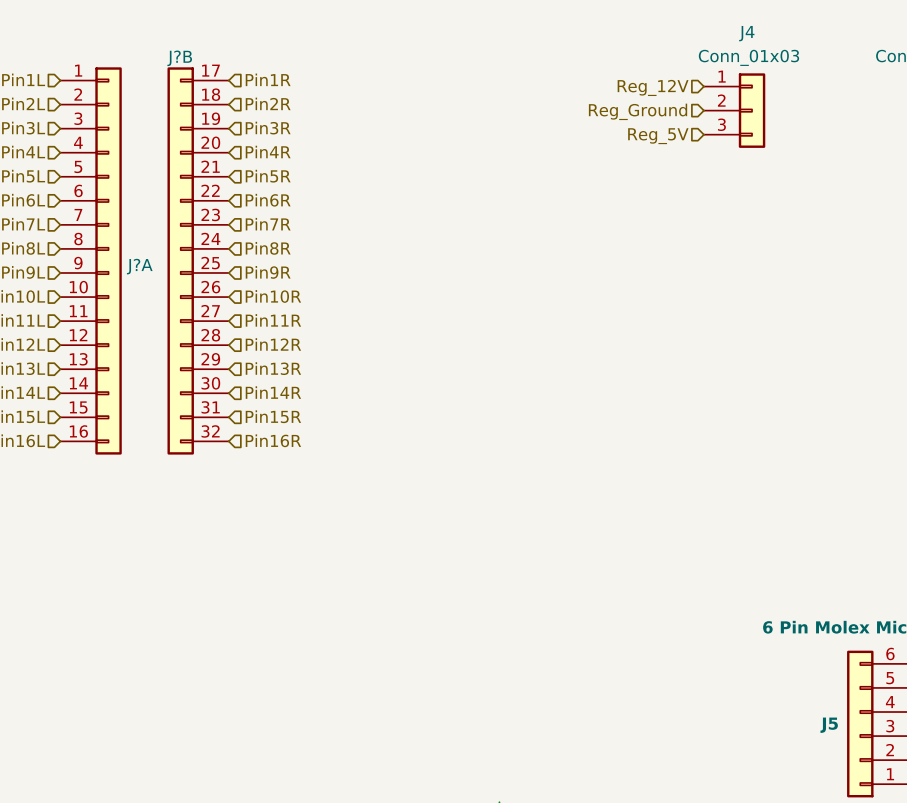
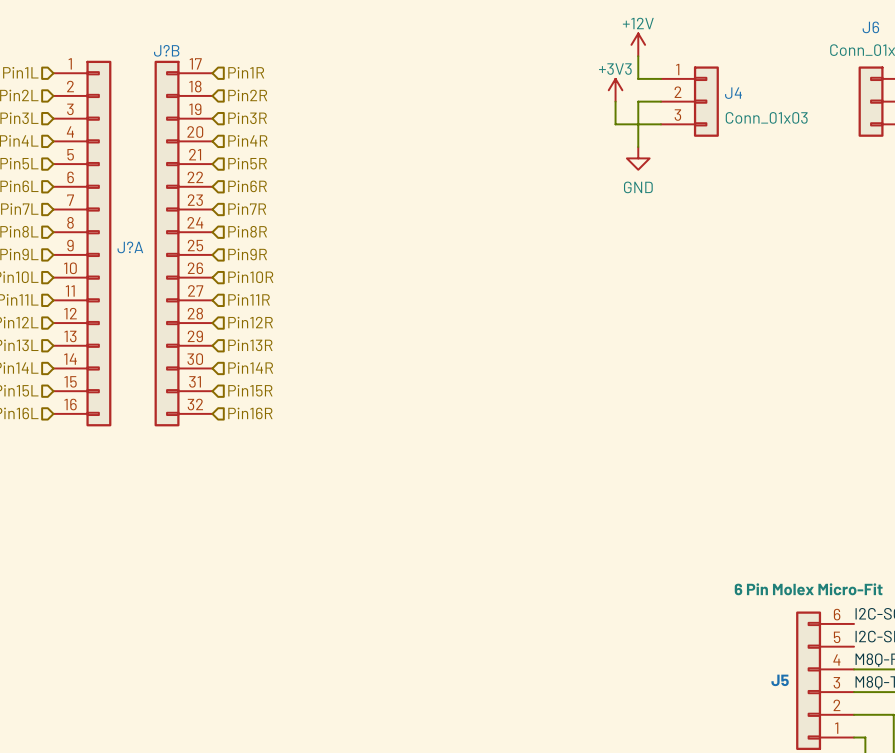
J4 name position: J4 (746, 33) -> J4 (733, 93)
power symbol: none -> +12V (638, 44)
J4 value position: Conn_01x03 (748, 57) -> Conn_01x03 (766, 117)
wire: none -> (638, 56) (638, 78) (660, 78)
hierarchical label: Reg_12V (653, 87) -> none
power symbol: none -> +3V3 (615, 90)
wire: none -> (615, 101) (615, 124) (660, 124)
wire: none -> (660, 101) (638, 101) (638, 147)
hierarchical label: Reg_Ground (638, 111) -> none
hierarchical label: Reg_5V (658, 136) -> none
power symbol: none -> GND (638, 158)

